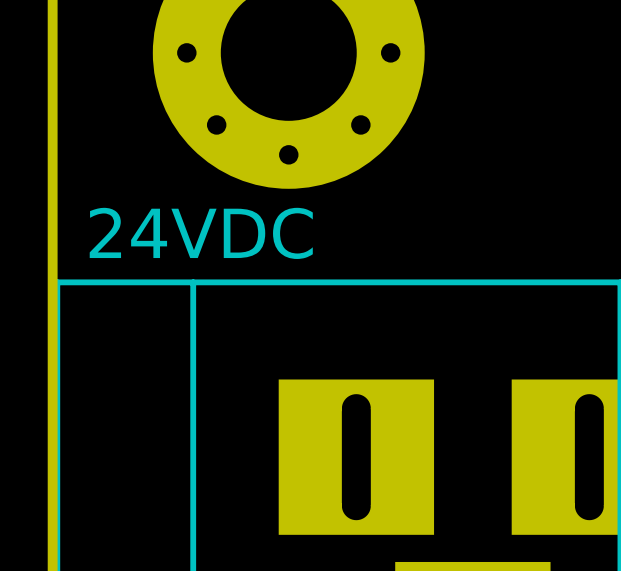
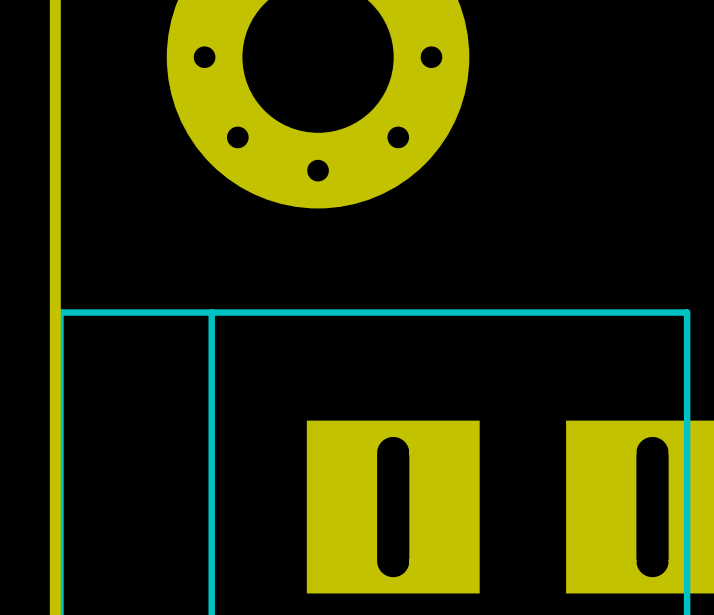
text: 24VDC (201, 233) -> none

